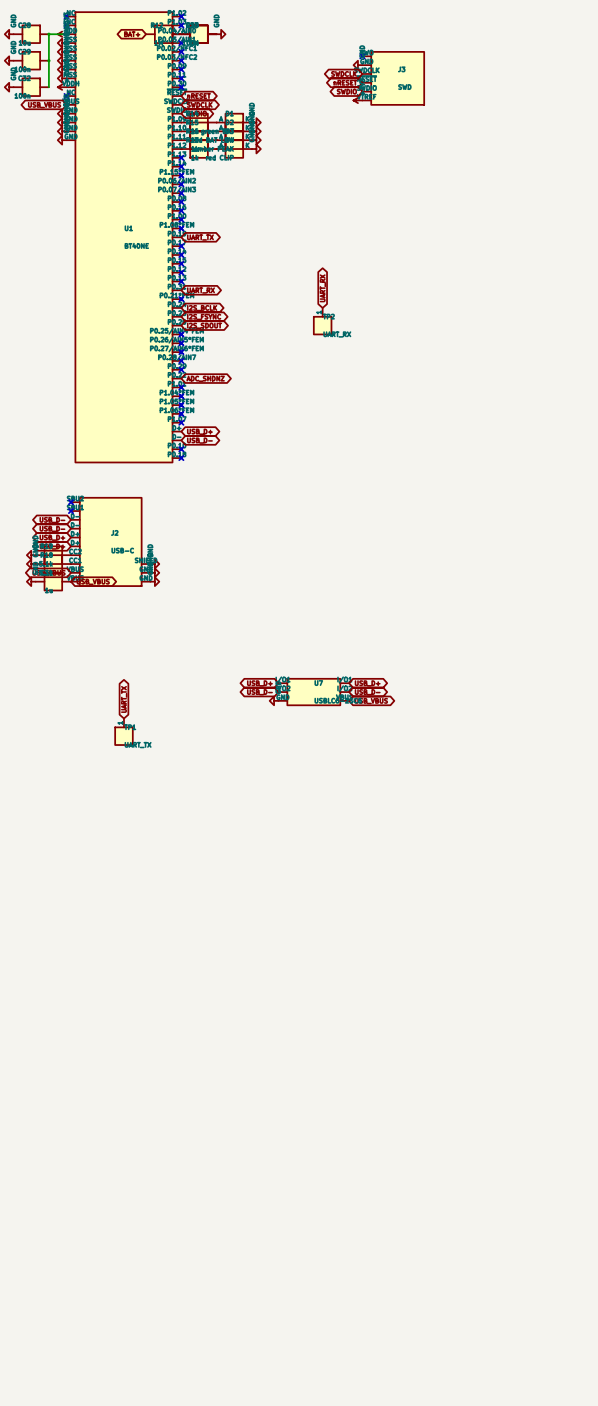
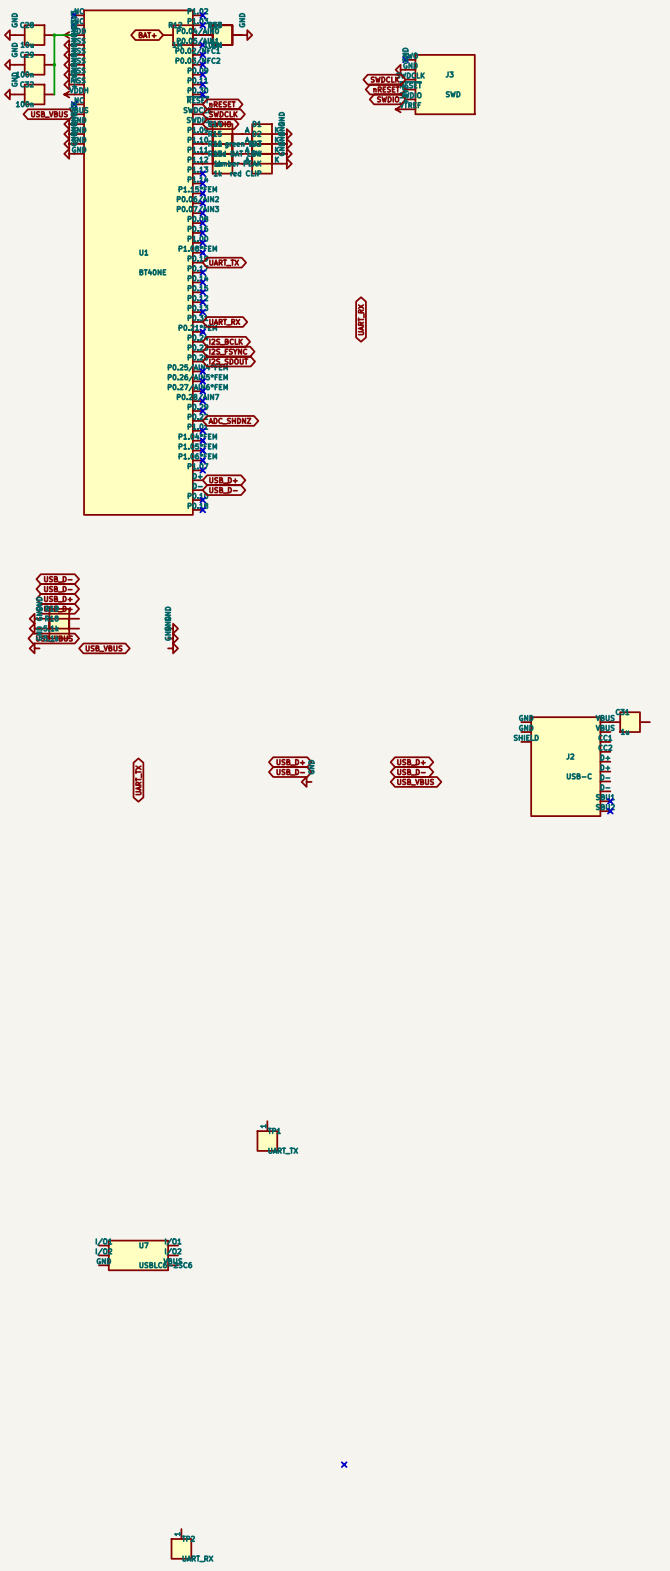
part position: (322, 321) -> (181, 1544)
no-connect mark: (70, 502) -> none
no-connect mark: (70, 511) -> none
part rotation: 0° (110, 541) -> 180° (565, 766)
part position: (110, 541) -> (565, 766)
part position: (53, 581) -> (630, 722)
part position: (313, 692) -> (138, 1255)
no-connect mark: none -> (610, 801)
no-connect mark: none -> (610, 811)
part position: (123, 731) -> (267, 1136)
no-connect mark: none -> (344, 1464)

